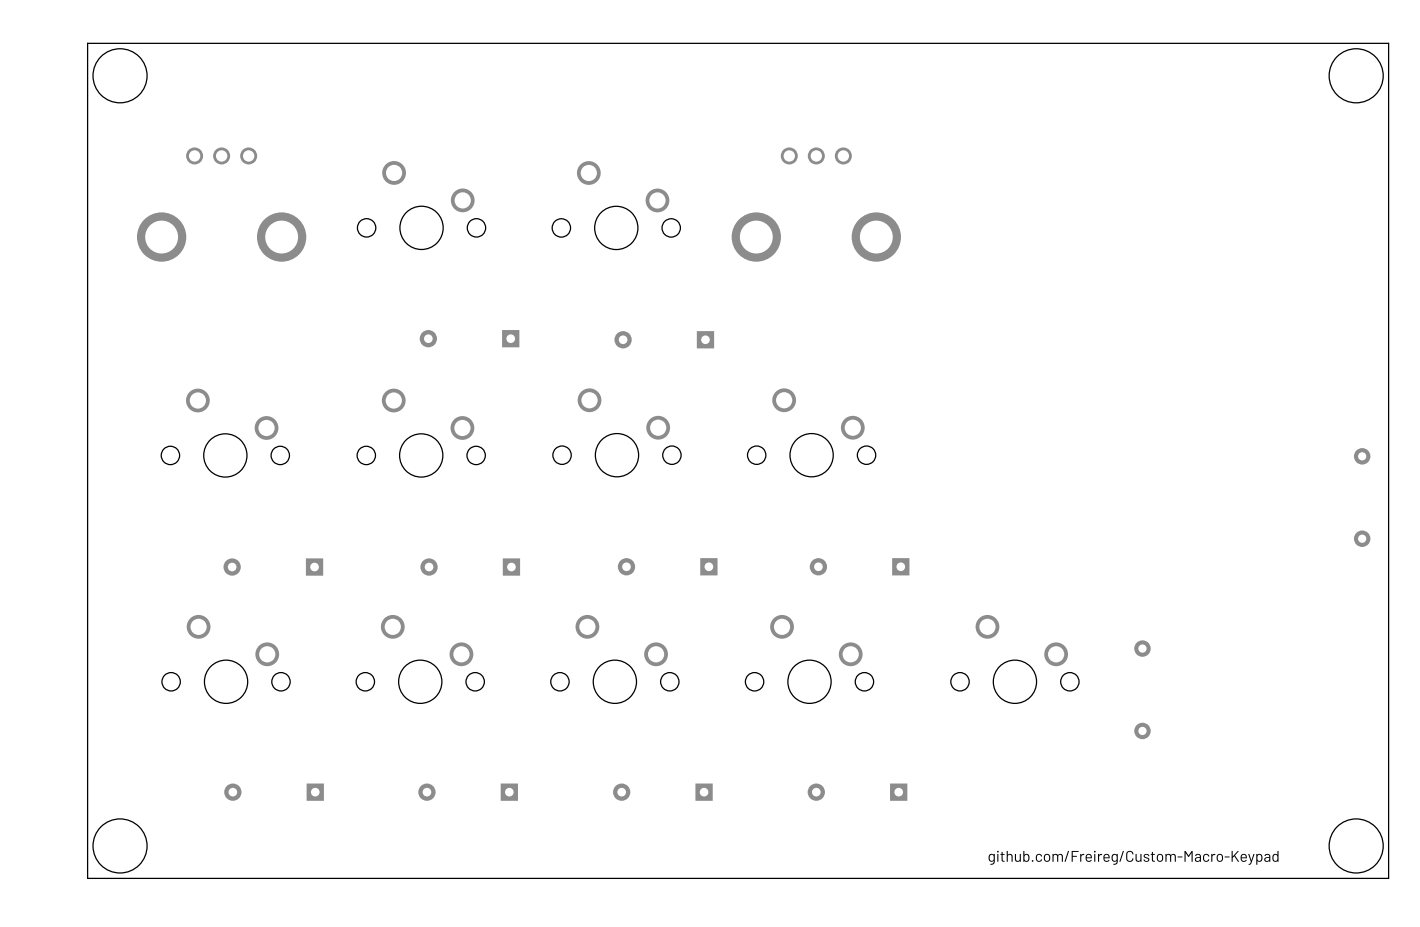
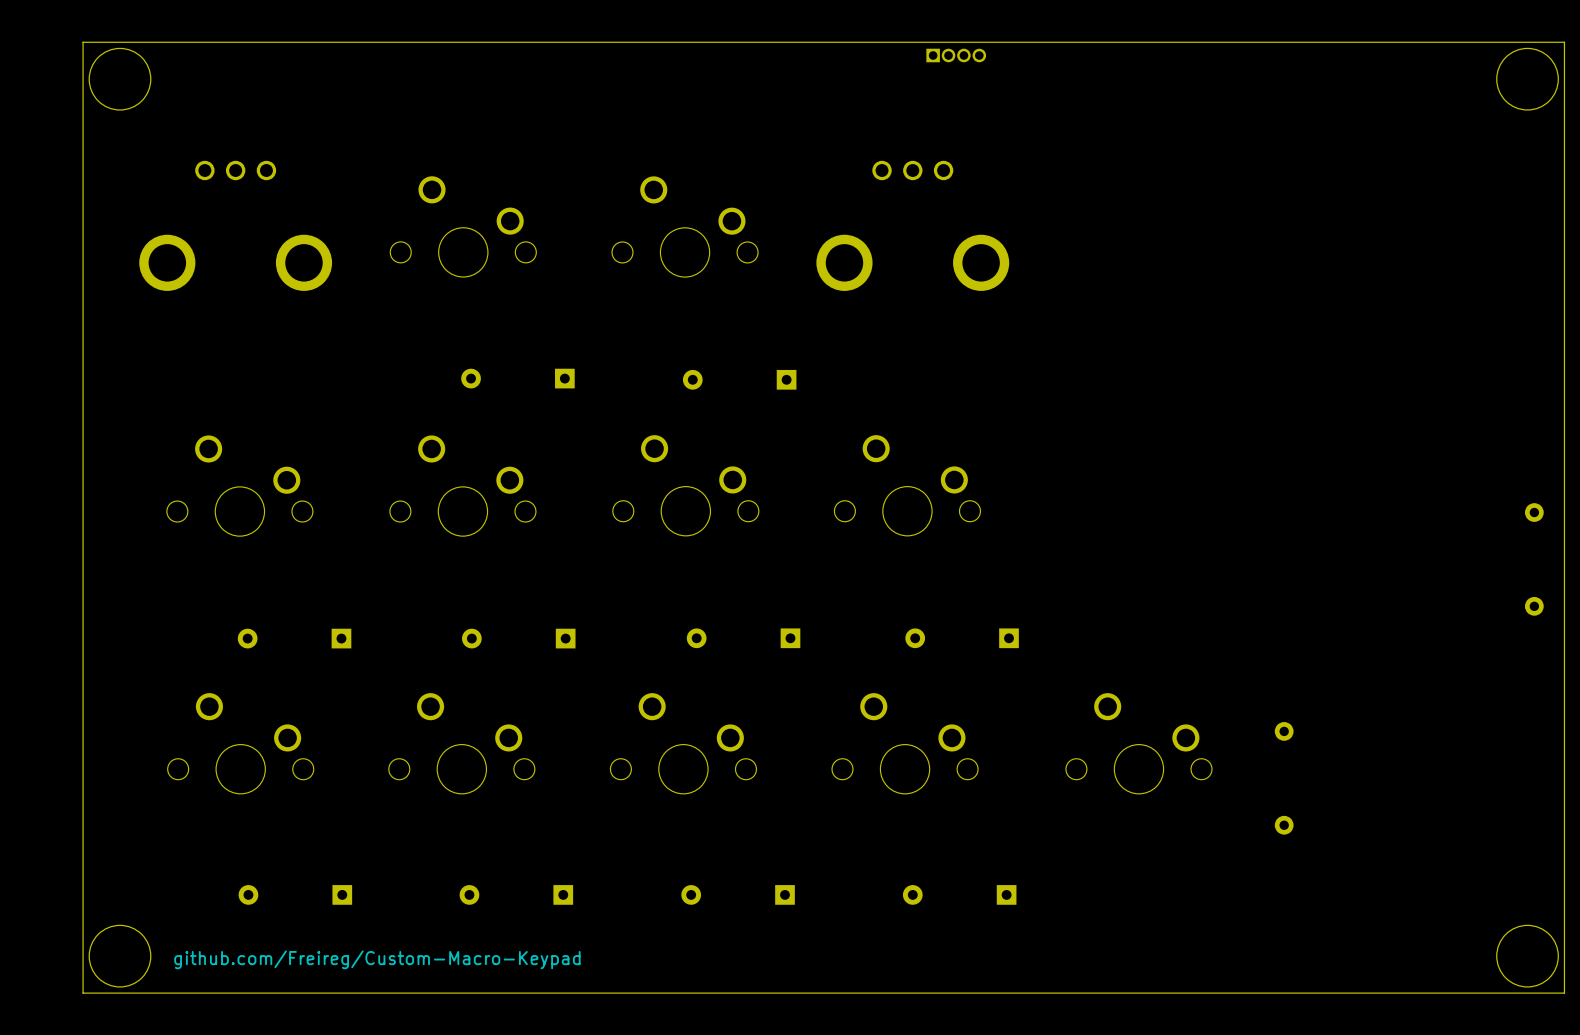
part: none -> (956, 55)
text: none -> github.com/Freireg/Custom-Macro-Keypad (377, 959)
text: github.com/Freireg/Custom-Macro-Keypad (1133, 857) -> none

